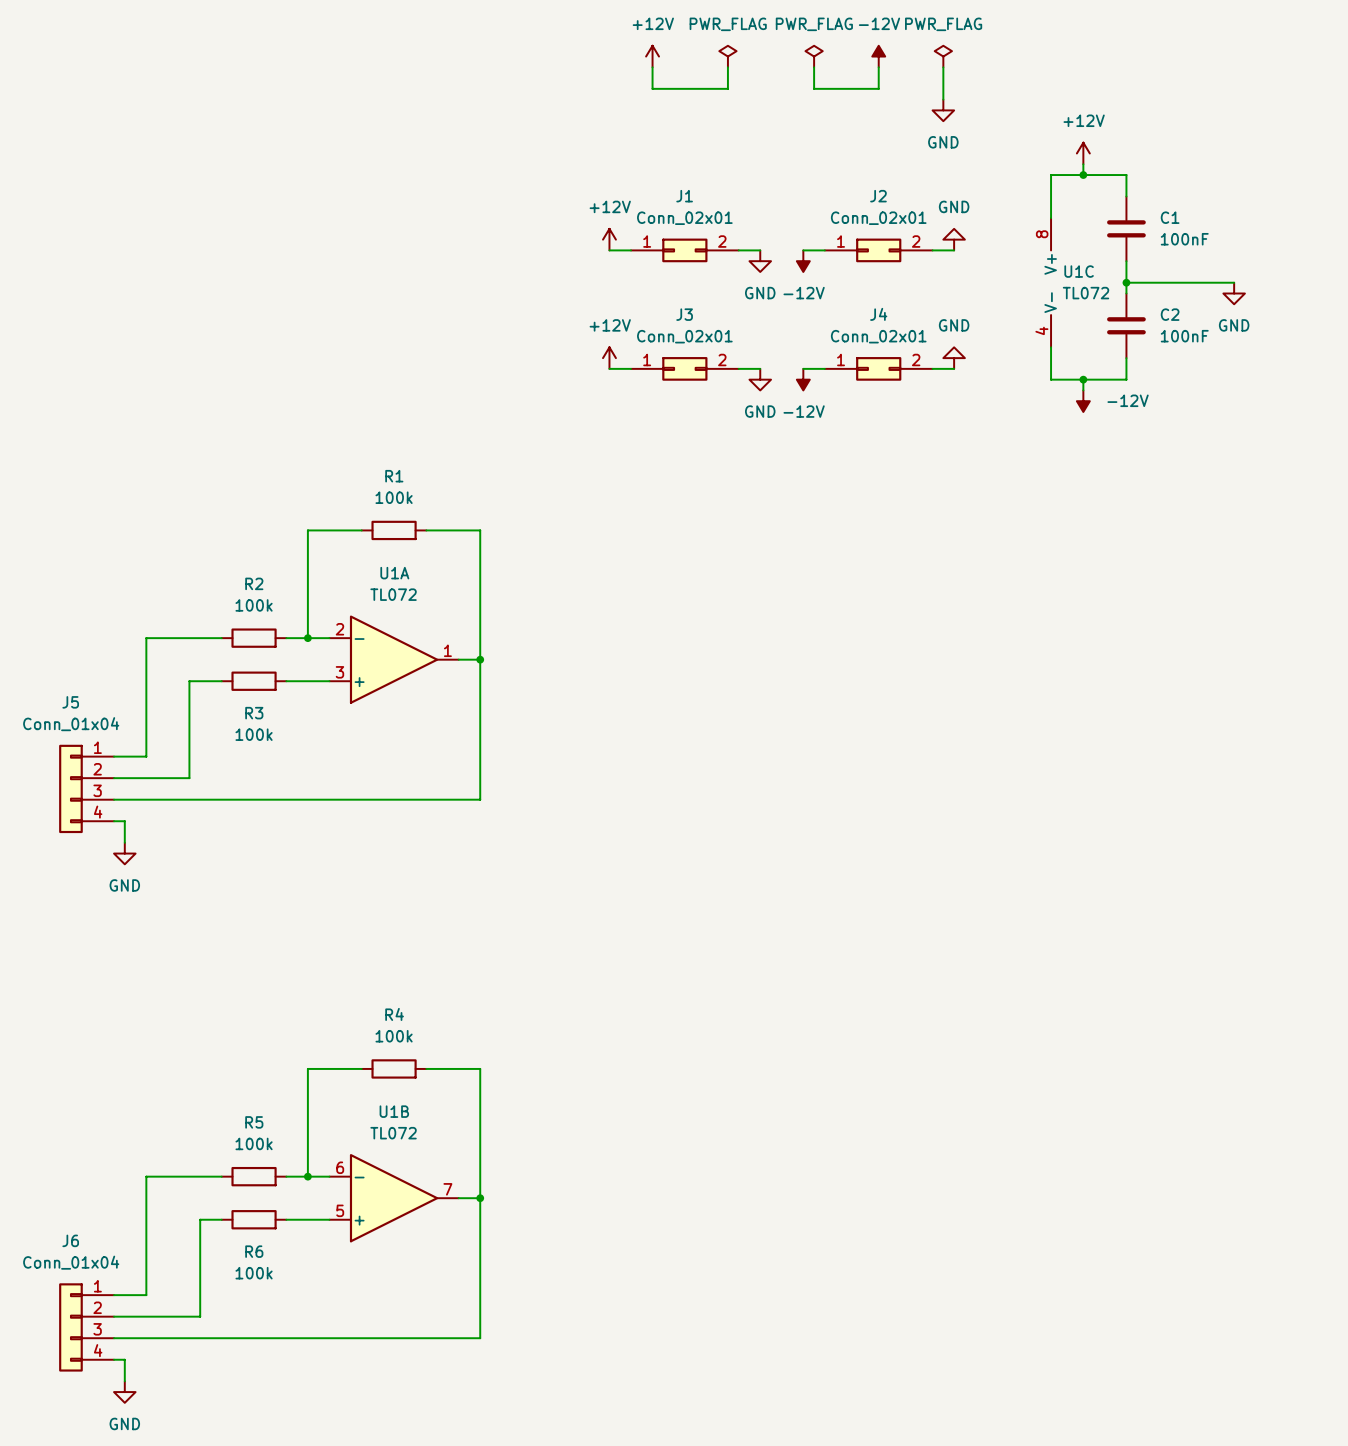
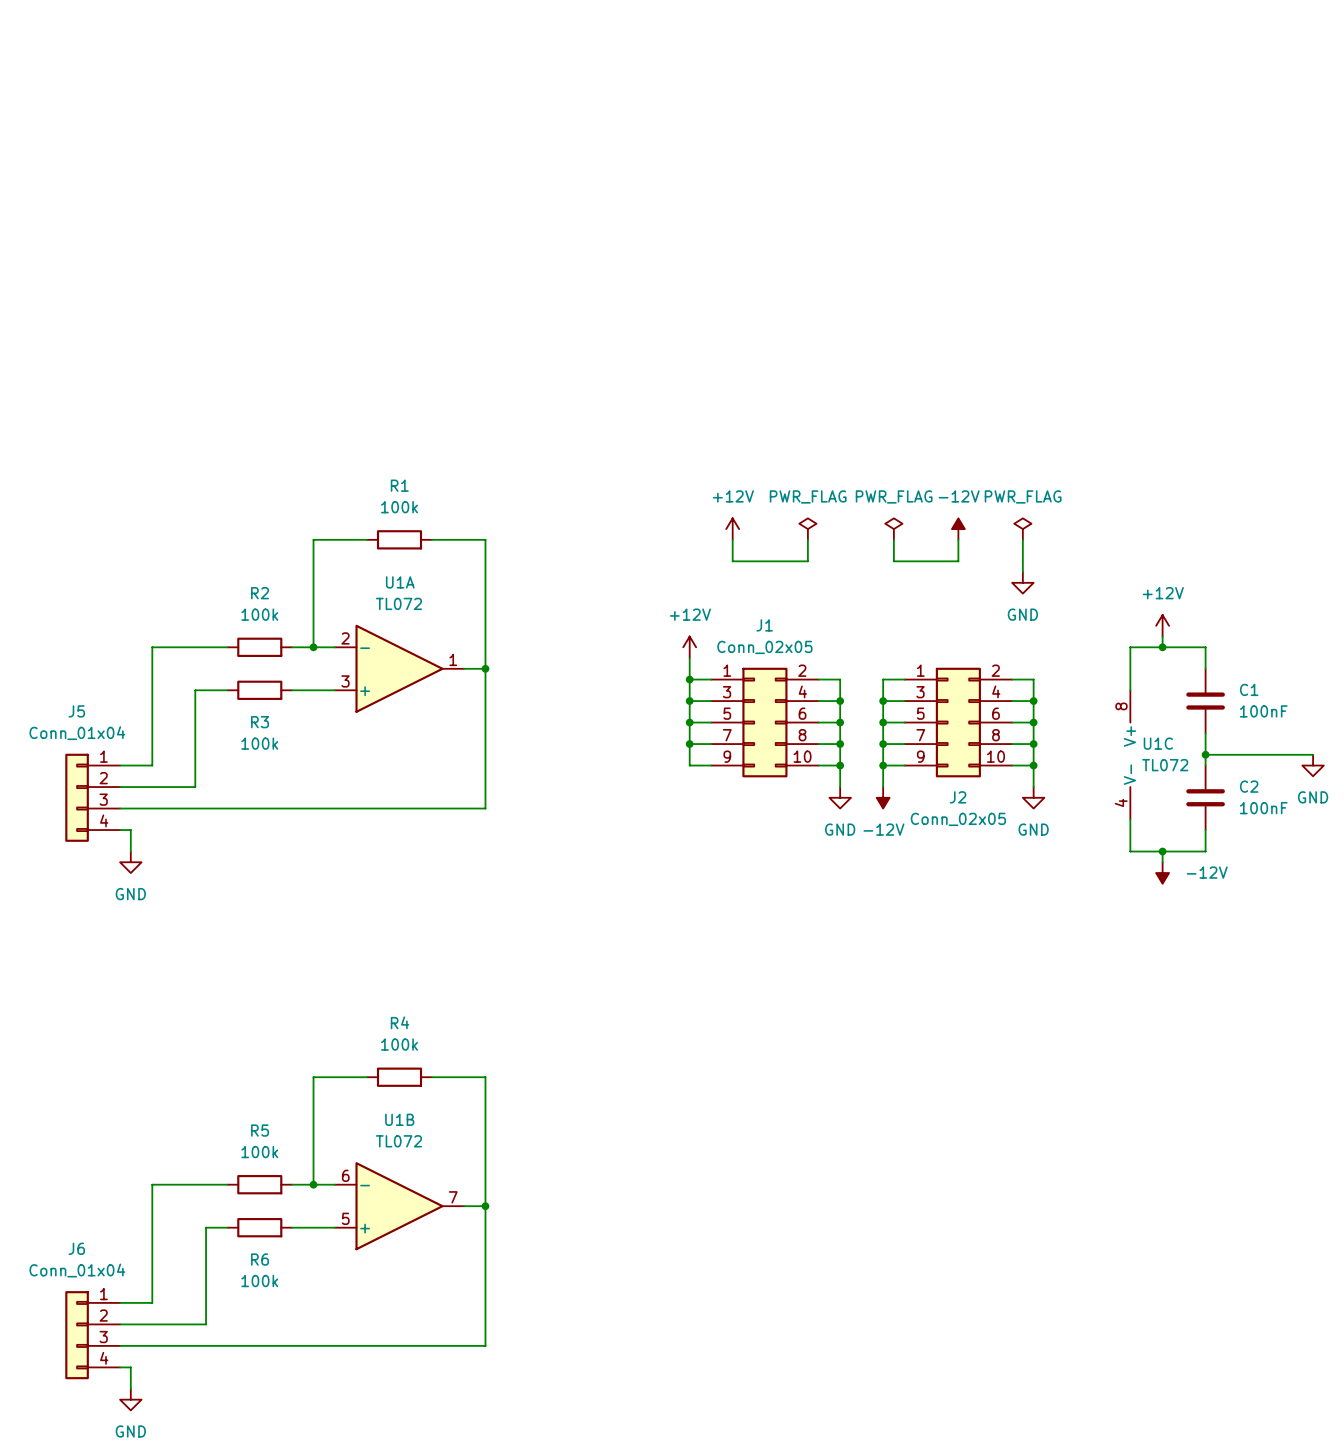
power symbol: +12V (652, 56) -> none
power symbol: PWR_FLAG (727, 56) -> none
power symbol: PWR_FLAG (814, 56) -> none
power symbol: -12V (878, 56) -> none
power symbol: PWR_FLAG (943, 56) -> none
wire: (652, 67) (652, 88) (727, 88) (727, 67) -> none
wire: (814, 67) (814, 88) (878, 88) (878, 67) -> none
wire: (943, 67) (943, 99) -> none
power symbol: GND (943, 110) -> none
power symbol: +12V (1083, 153) -> none
wire: (1083, 164) (1083, 175) -> none
junction: (1083, 175) -> none
J1 name position: J1 (684, 196) -> J1 (764, 625)
J2 name position: J2 (878, 196) -> J2 (958, 797)
wire: (1126, 196) (1126, 175) (1051, 175) (1051, 218) -> none
J1 value: Conn_02x01 (684, 218) -> Conn_02x05 (764, 647)
J2 value: Conn_02x01 (878, 218) -> Conn_02x05 (958, 819)
C1 position: (1126, 228) -> (1205, 701)
J1 symbol: [631, 238, 739, 263] -> [711, 667, 819, 778]
J2 symbol: [824, 238, 933, 263] -> [904, 667, 1013, 778]
power symbol: +12V (609, 239) -> none
power symbol: GND (954, 239) -> none
wire: (609, 250) (631, 250) -> none
wire: (738, 250) (760, 250) -> none
wire: (803, 250) (824, 250) -> none
wire: (932, 250) (954, 250) -> none
power symbol: GND (760, 261) -> none
power symbol: -12V (803, 261) -> none
wire: (1126, 261) (1126, 293) -> none
U1C position: (1051, 282) -> (1130, 754)
wire: (1126, 282) (1234, 282) -> none
junction: (1126, 282) -> none
power symbol: GND (1234, 293) -> none
C2 position: (1126, 325) -> (1205, 797)
wire: (1051, 347) (1051, 379) (1126, 379) (1126, 358) -> none
power symbol: +12V (609, 358) -> none
power symbol: GND (954, 358) -> none
wire: (609, 368) (631, 368) -> none
J3: Conn_02x01 (684, 368) -> none
wire: (738, 368) (760, 368) -> none
wire: (803, 368) (824, 368) -> none
J4: Conn_02x01 (878, 368) -> none
wire: (932, 368) (954, 368) -> none
power symbol: GND (760, 379) -> none
power symbol: -12V (803, 379) -> none
wire: (1083, 379) (1083, 390) -> none
junction: (1083, 379) -> none
power symbol: -12V (1083, 401) -> none
power symbol: none -> +12V (732, 529)
power symbol: none -> PWR_FLAG (807, 529)
power symbol: none -> PWR_FLAG (893, 529)
power symbol: none -> -12V (958, 529)
power symbol: none -> PWR_FLAG (1022, 529)
wire: none -> (732, 539) (732, 561) (807, 561) (807, 539)
wire: none -> (893, 539) (893, 561) (958, 561) (958, 539)
wire: none -> (1022, 539) (1022, 572)
power symbol: none -> GND (1022, 582)
power symbol: none -> +12V (1162, 625)
wire: none -> (1162, 636) (1162, 647)
power symbol: none -> +12V (689, 647)
junction: none -> (1162, 647)
wire: none -> (689, 658) (689, 765) (711, 765)
wire: none -> (1205, 668) (1205, 647) (1130, 647) (1130, 690)
wire: none -> (689, 679) (711, 679)
junction: none -> (689, 679)
wire: none -> (818, 679) (840, 679) (840, 787)
wire: none -> (904, 679) (883, 679) (883, 787)
wire: none -> (1012, 679) (1033, 679) (1033, 787)
wire: none -> (689, 701) (711, 701)
junction: none -> (689, 701)
wire: none -> (818, 701) (840, 701)
junction: none -> (840, 701)
wire: none -> (883, 701) (904, 701)
junction: none -> (883, 701)
wire: none -> (1012, 701) (1033, 701)
junction: none -> (1033, 701)
wire: none -> (689, 722) (711, 722)
junction: none -> (689, 722)
wire: none -> (818, 722) (840, 722)
junction: none -> (840, 722)
wire: none -> (883, 722) (904, 722)
junction: none -> (883, 722)
wire: none -> (1012, 722) (1033, 722)
junction: none -> (1033, 722)
wire: none -> (1205, 733) (1205, 765)
wire: none -> (689, 744) (711, 744)
junction: none -> (689, 744)
wire: none -> (818, 744) (840, 744)
junction: none -> (840, 744)
wire: none -> (883, 744) (904, 744)
junction: none -> (883, 744)
wire: none -> (1012, 744) (1033, 744)
junction: none -> (1033, 744)
wire: none -> (1205, 754) (1313, 754)
junction: none -> (1205, 754)
wire: none -> (818, 765) (840, 765)
junction: none -> (840, 765)
wire: none -> (883, 765) (904, 765)
junction: none -> (883, 765)
wire: none -> (1012, 765) (1033, 765)
junction: none -> (1033, 765)
power symbol: none -> GND (1313, 765)
power symbol: none -> GND (840, 797)
power symbol: none -> -12V (883, 797)
power symbol: none -> GND (1033, 797)
wire: none -> (1130, 819) (1130, 851) (1205, 851) (1205, 830)
wire: none -> (1162, 851) (1162, 862)
junction: none -> (1162, 851)
power symbol: none -> -12V (1162, 873)

